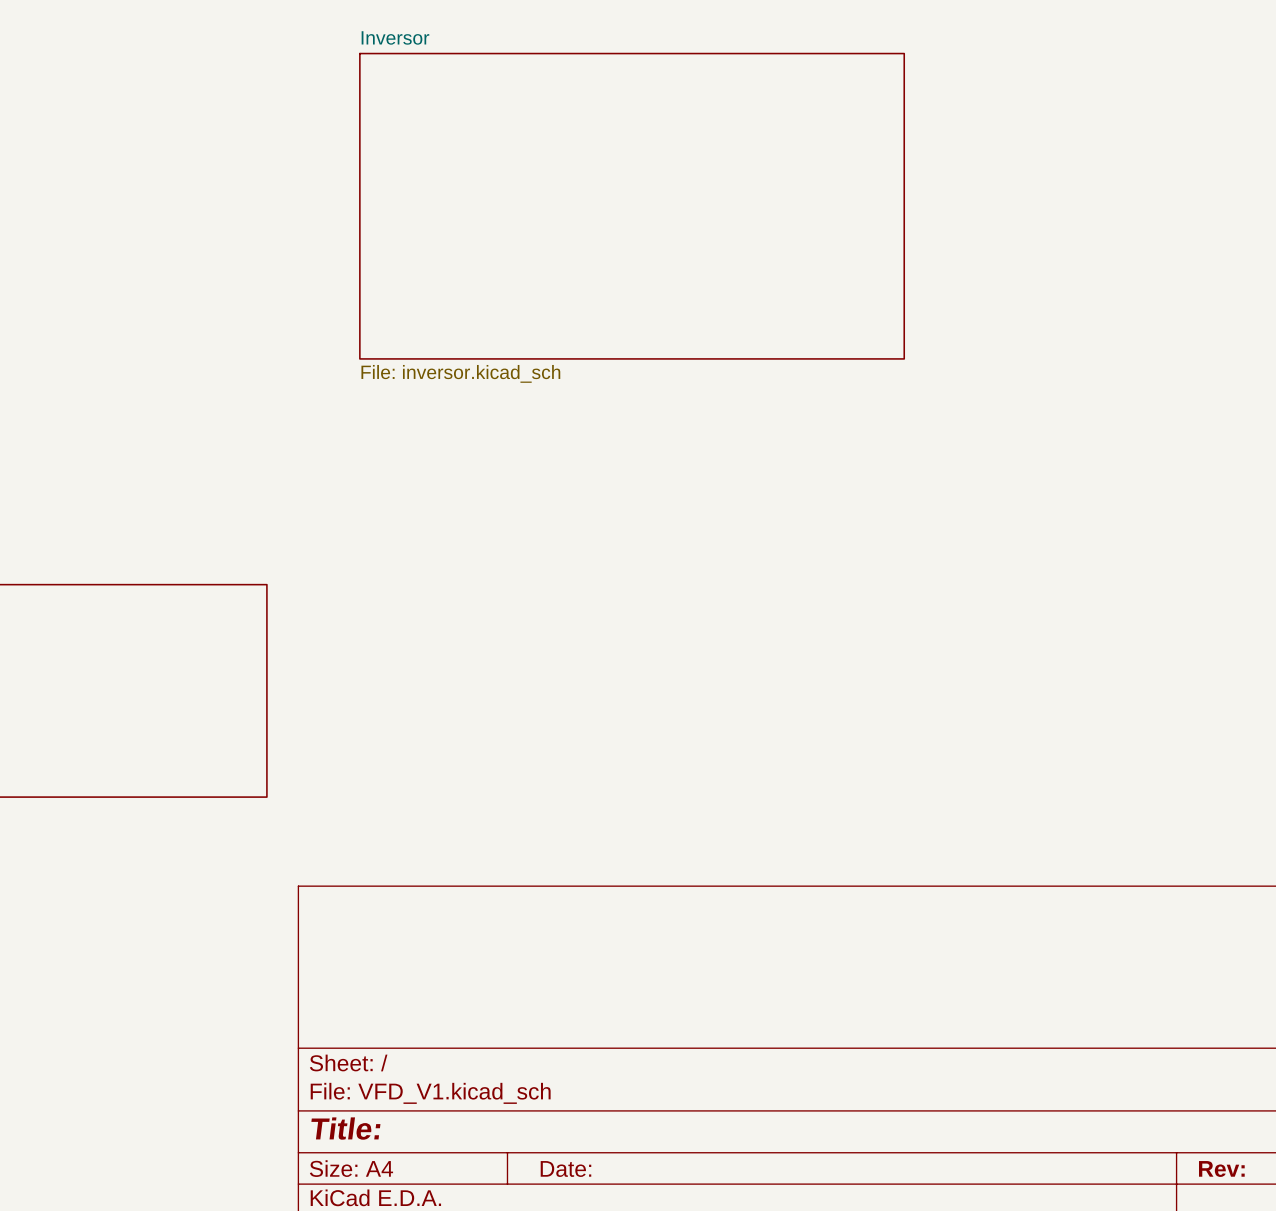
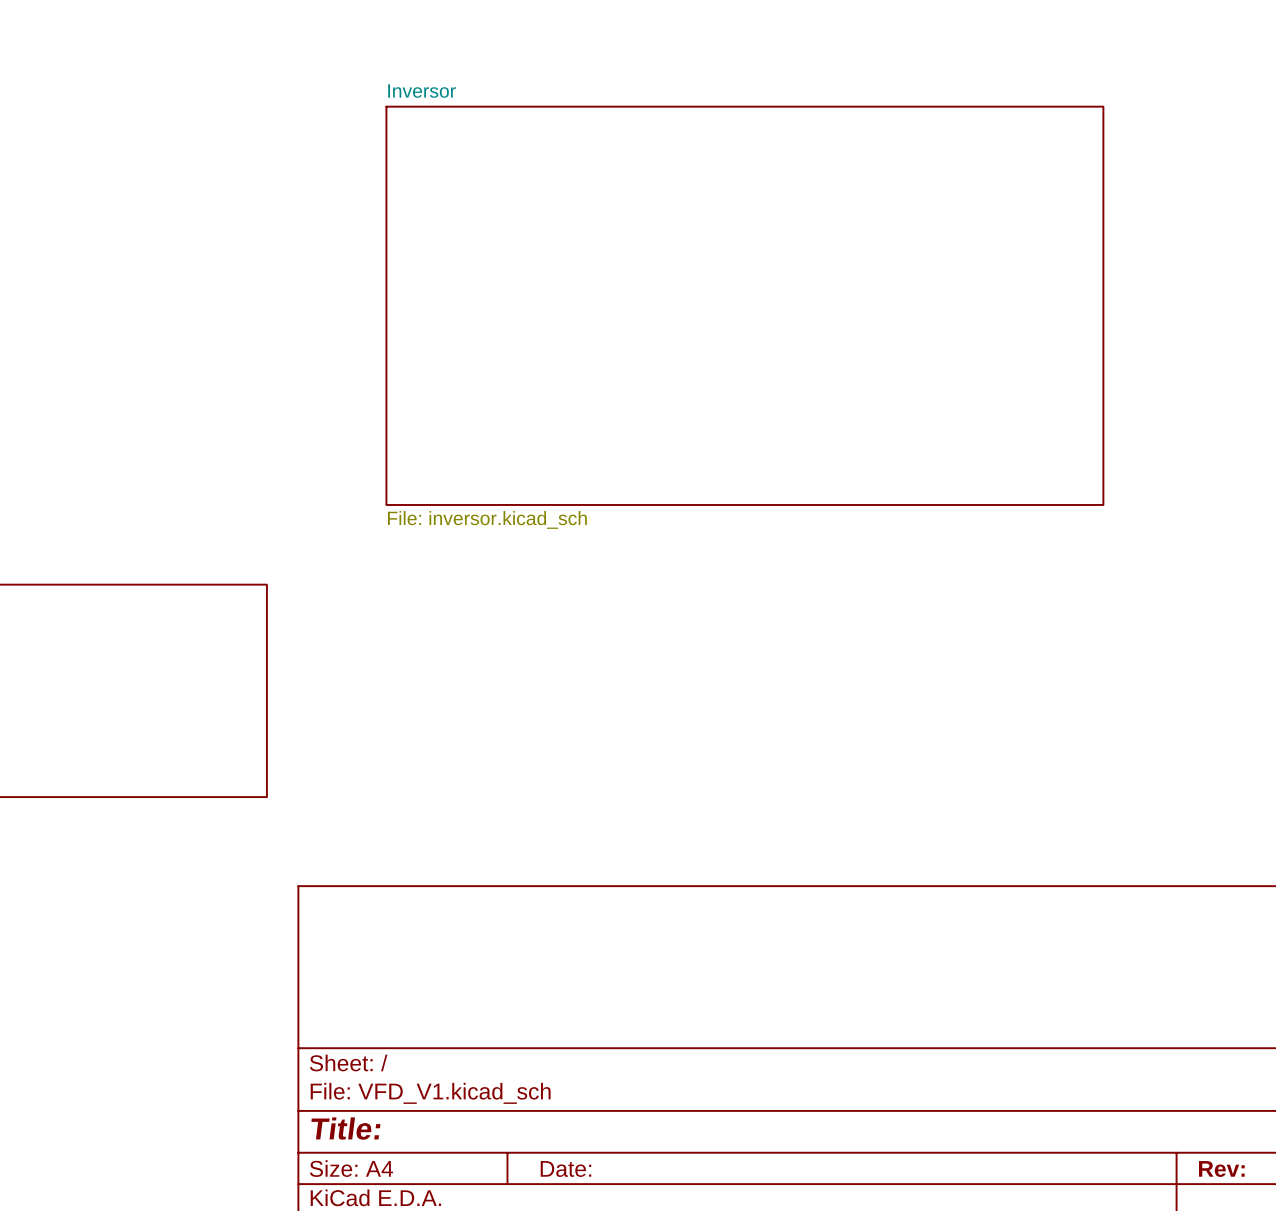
sheet Inversor: File: inversor.kicad_sch (632, 206) -> none
sheet Inversor: none -> File: inversor.kicad_sch (744, 305)

